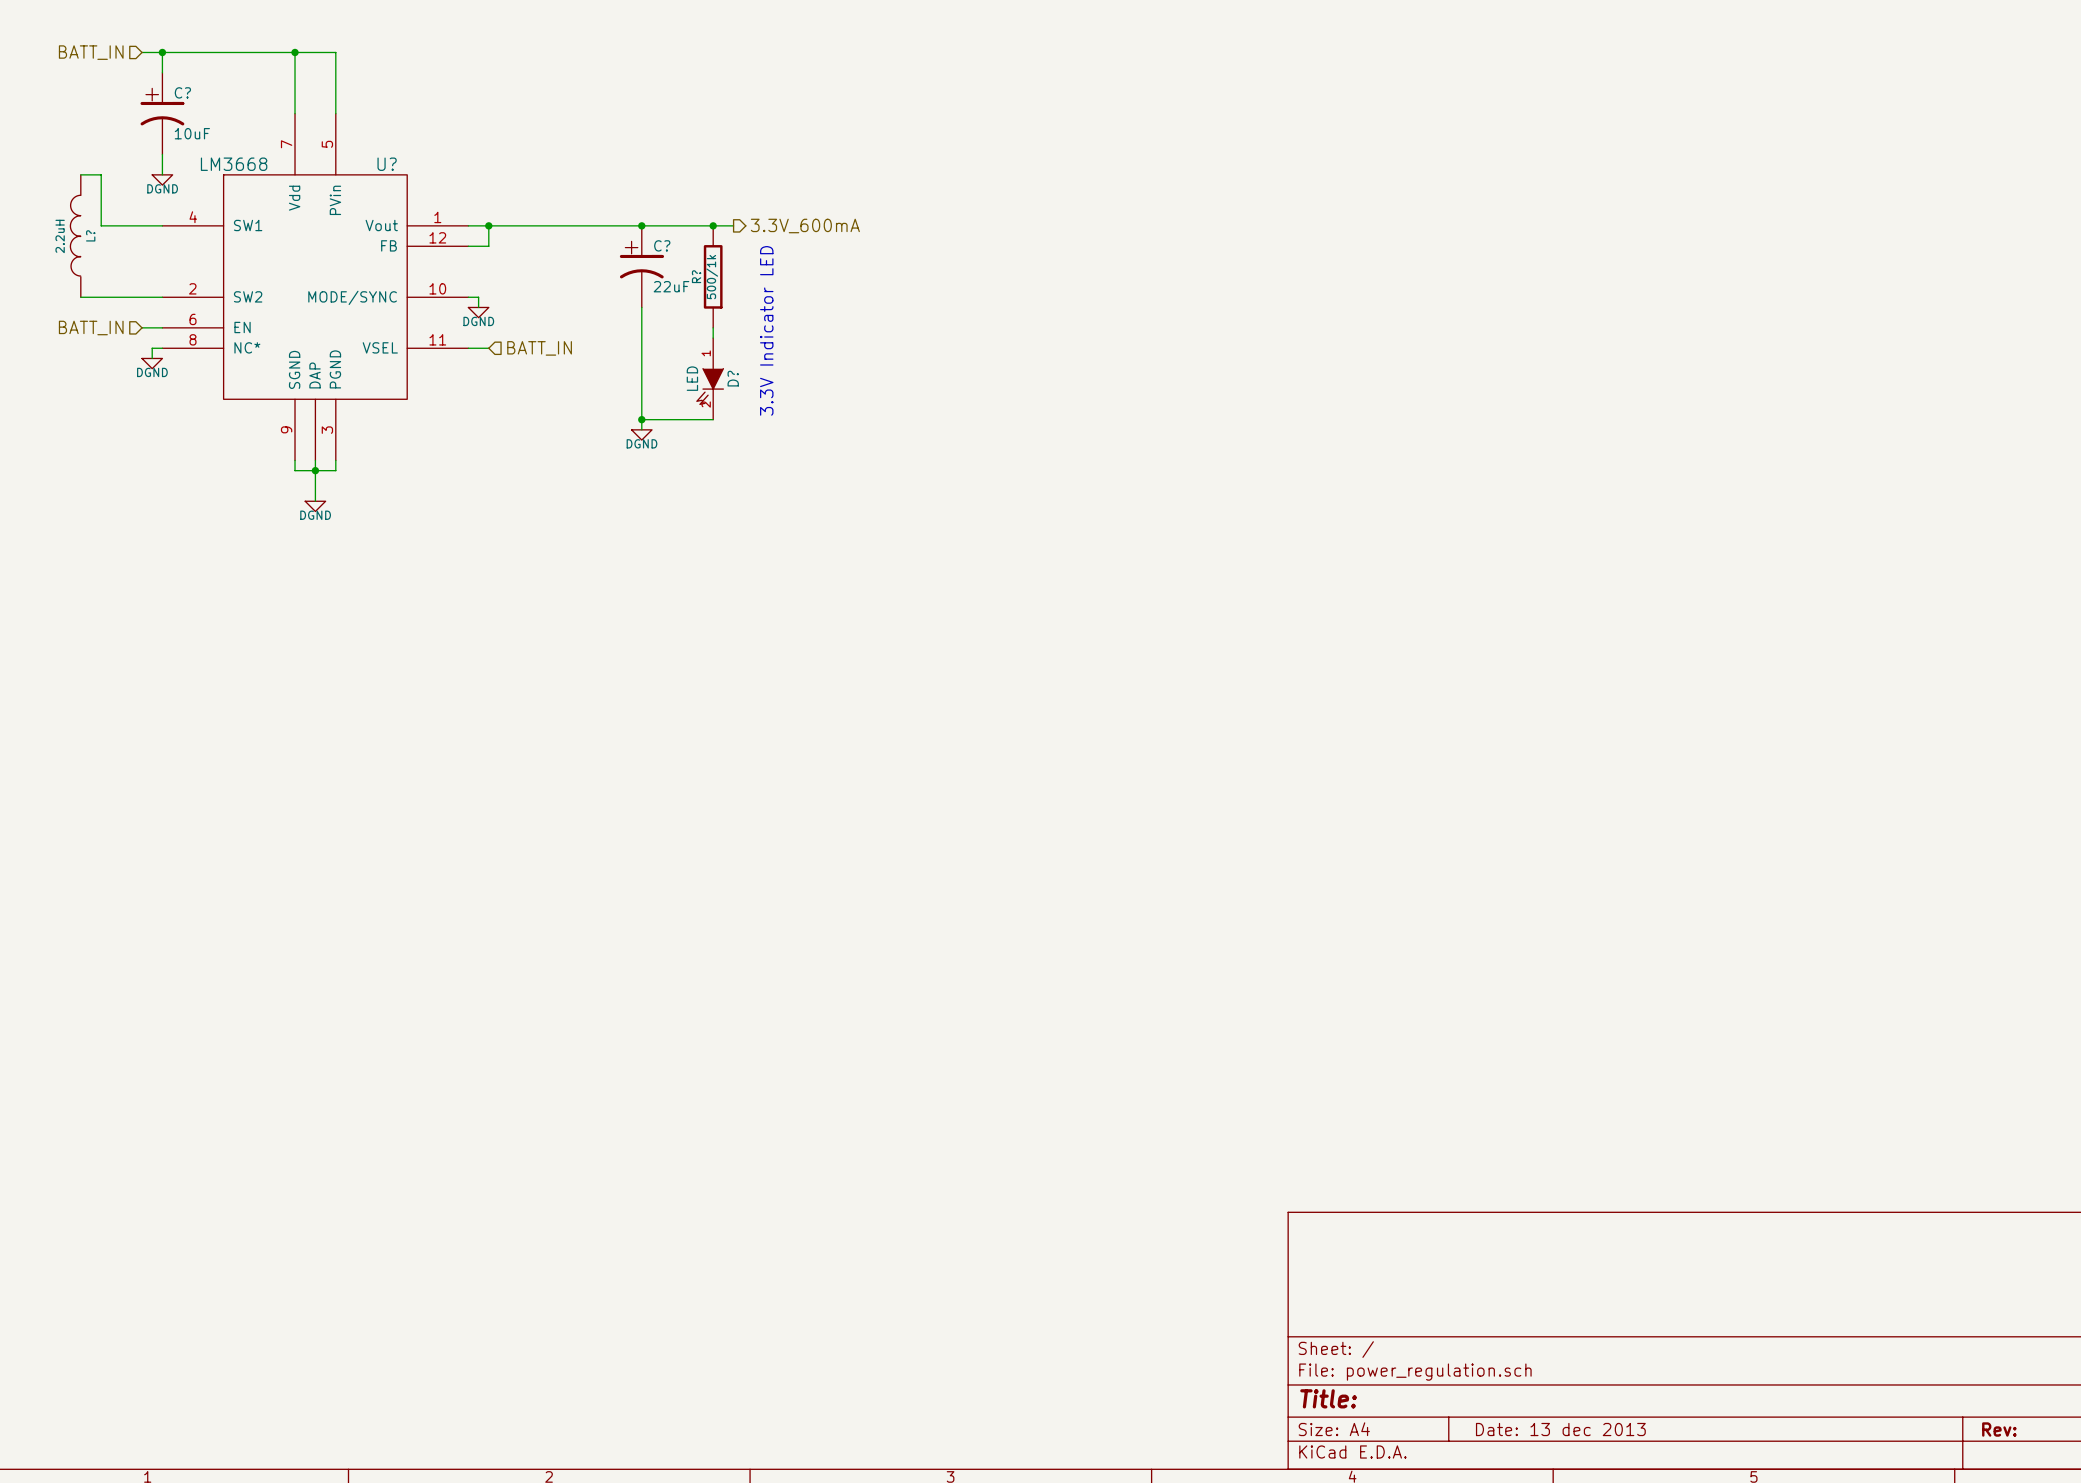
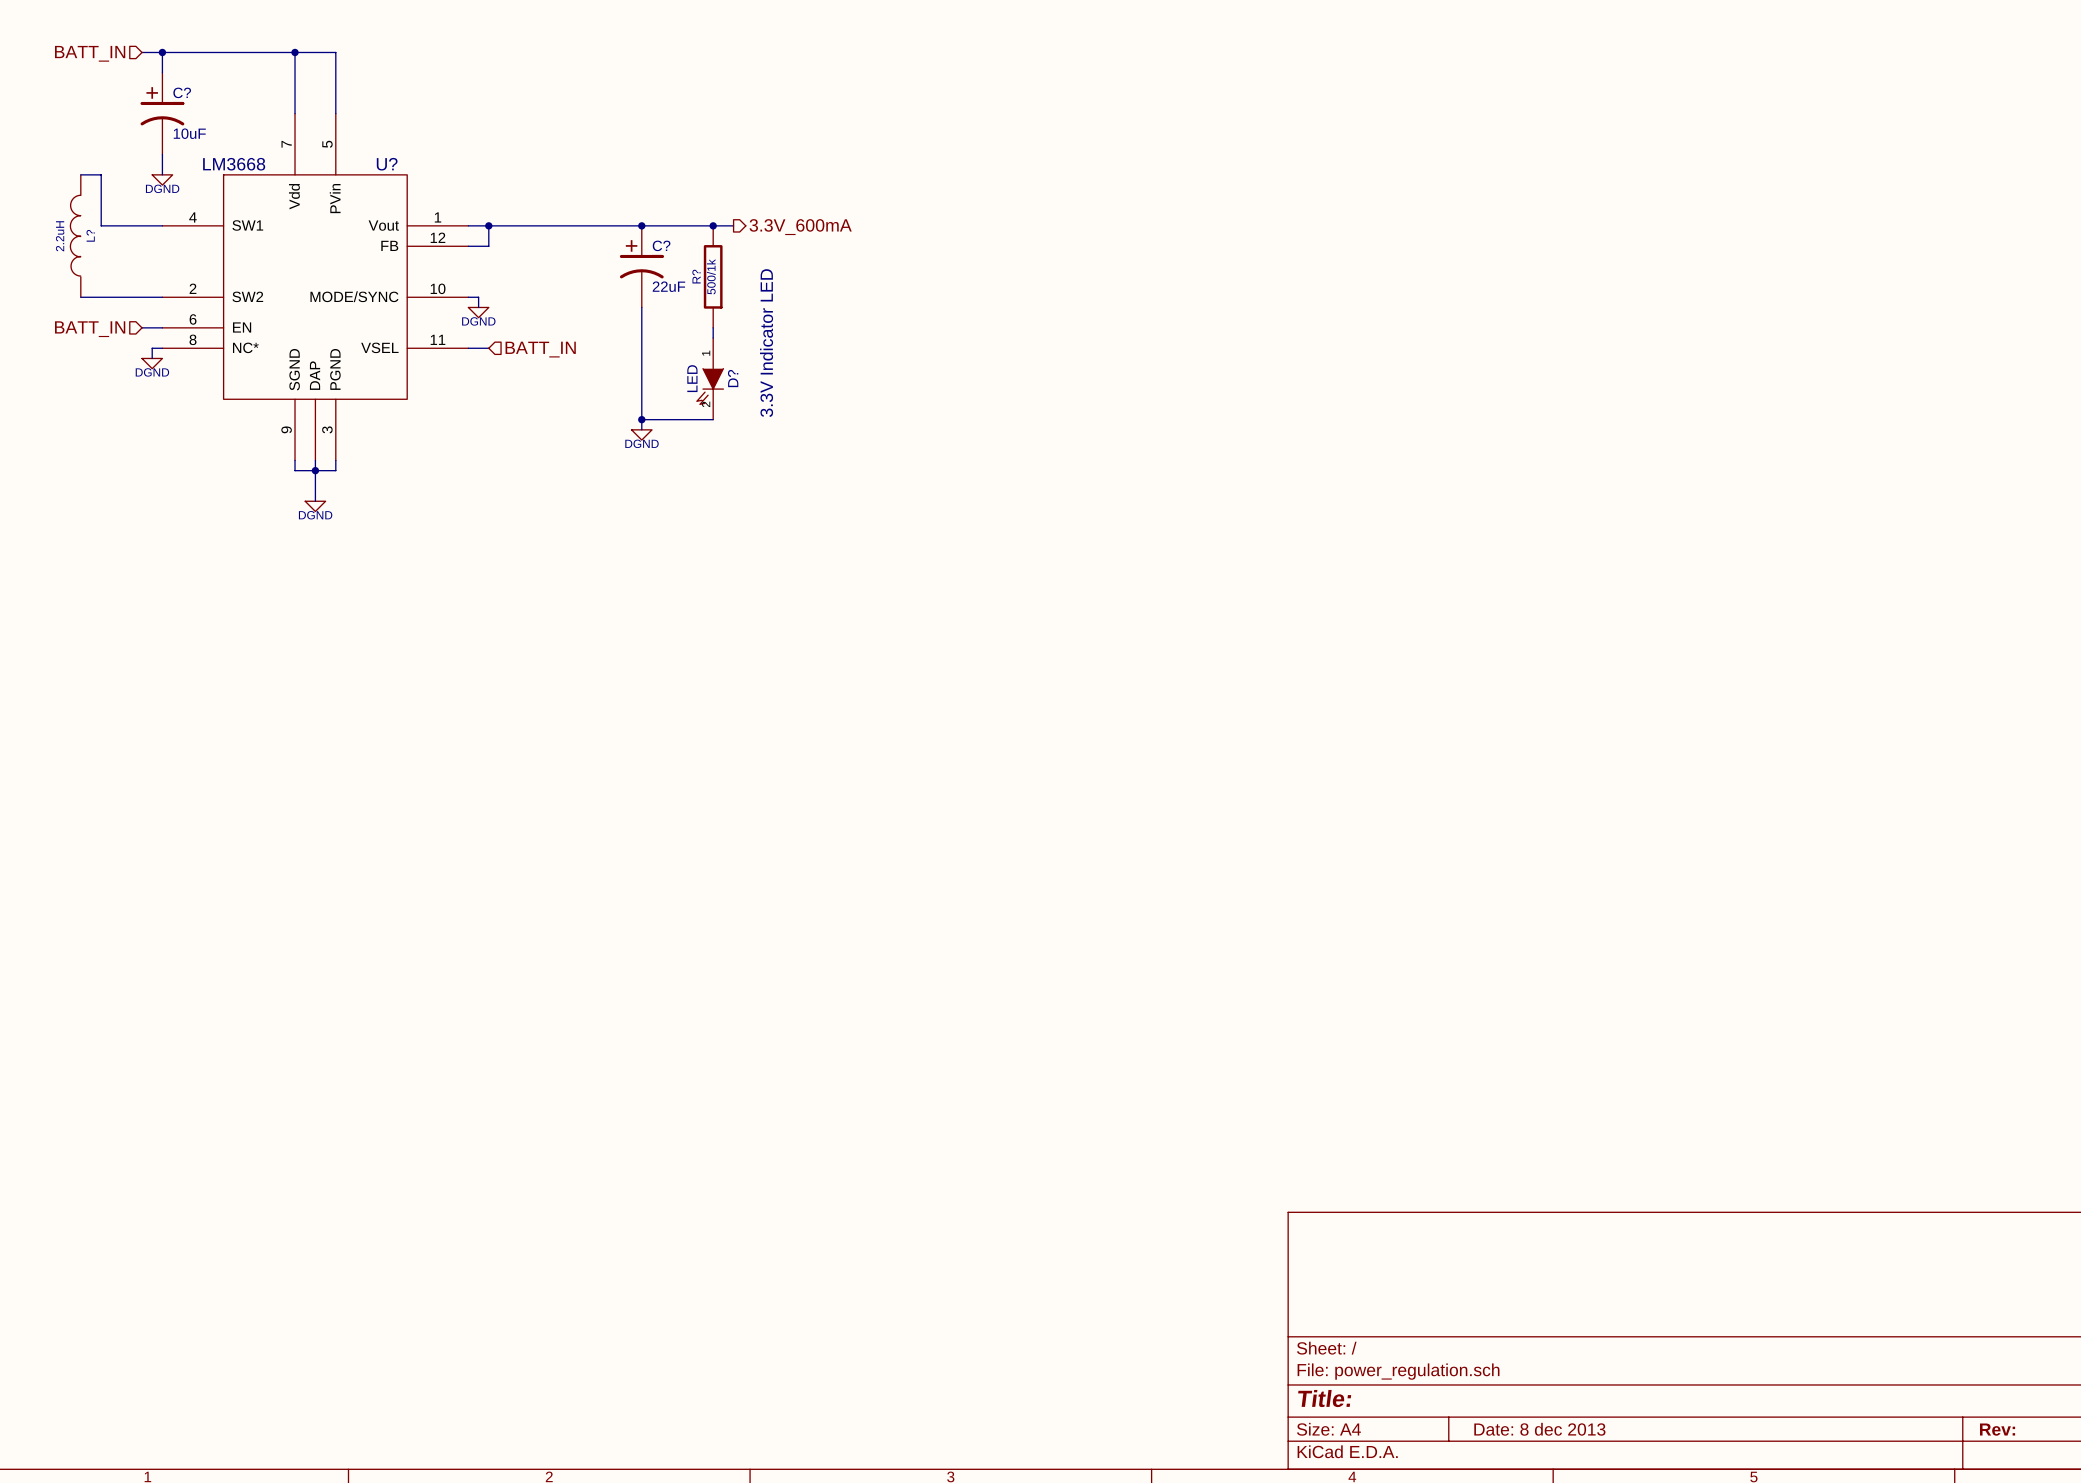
title block: Date: 13 dec 2013 (1560, 1429) -> Date: 8 dec 2013 (1539, 1429)

